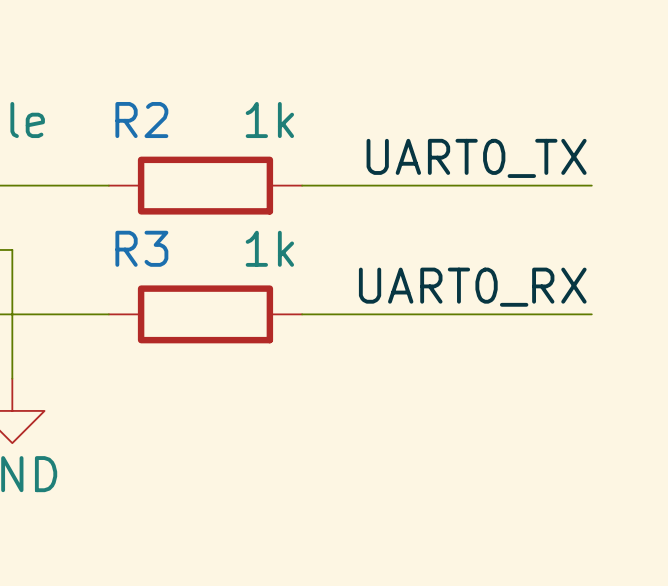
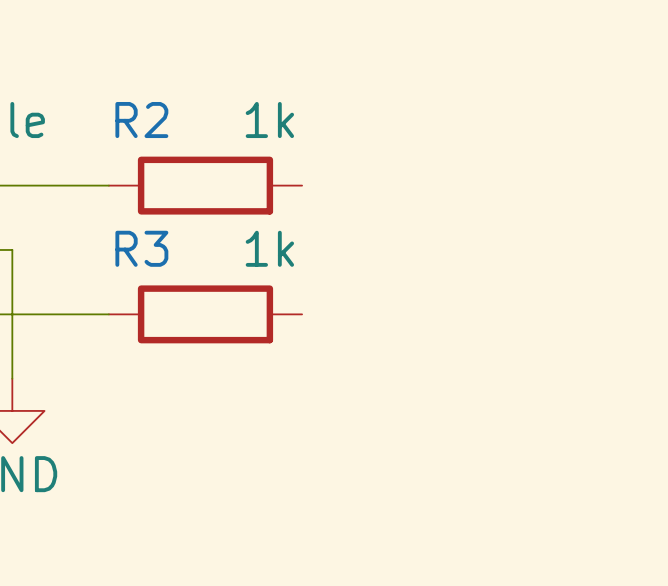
label: UART0_TX (476, 158) -> none
wire: (302, 185) (591, 185) -> none
label: UART0_RX (472, 287) -> none
wire: (302, 314) (591, 314) -> none

